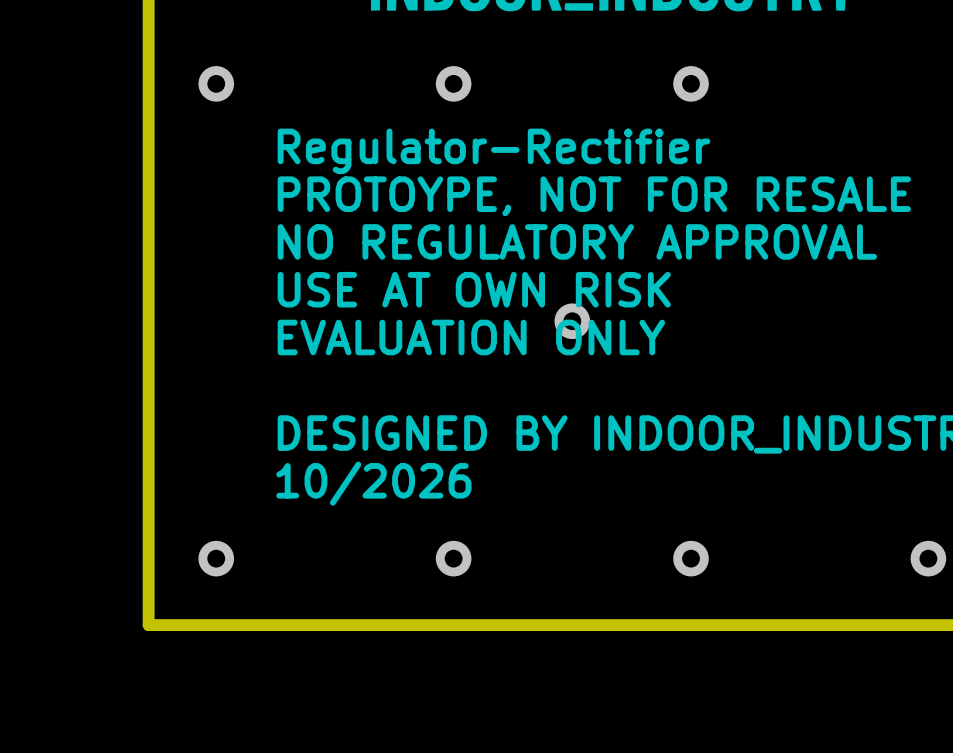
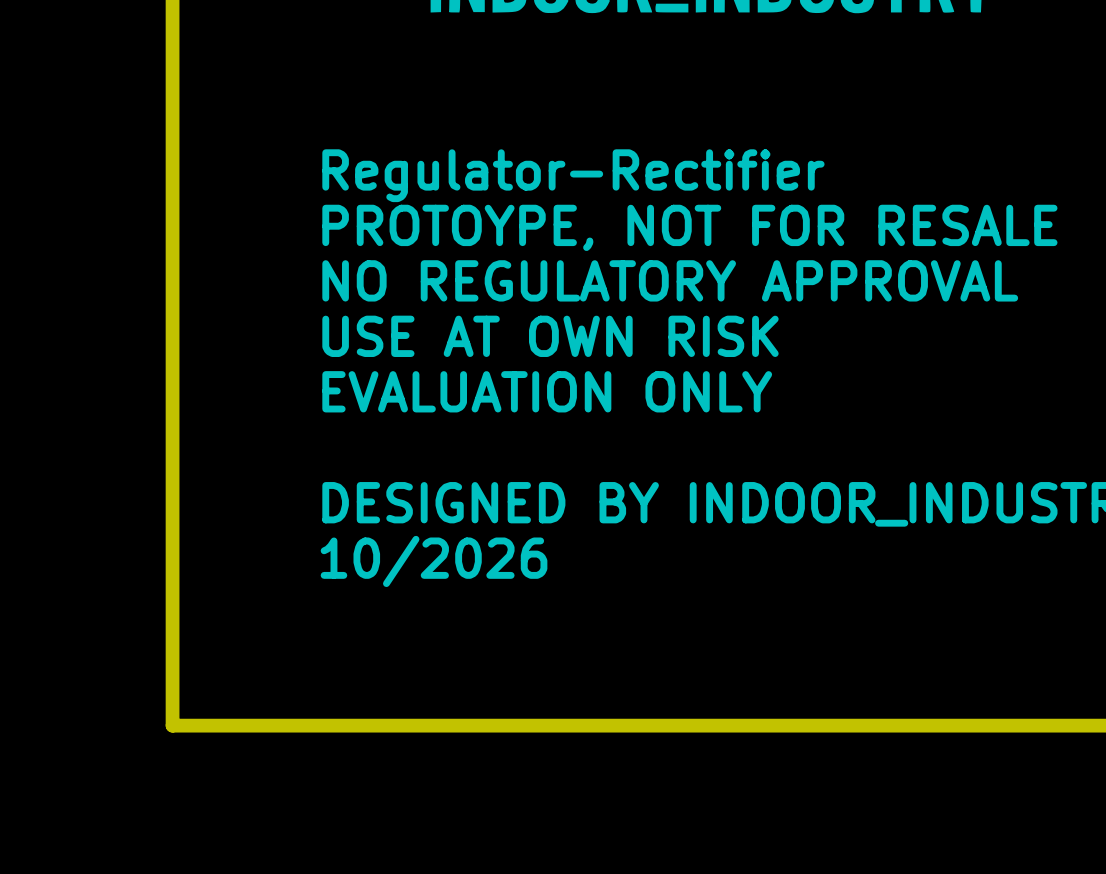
via: (216, 83) -> none
via: (453, 83) -> none
via: (691, 83) -> none
via: (572, 321) -> none
via: (216, 558) -> none
via: (453, 558) -> none
via: (691, 558) -> none
via: (928, 558) -> none

